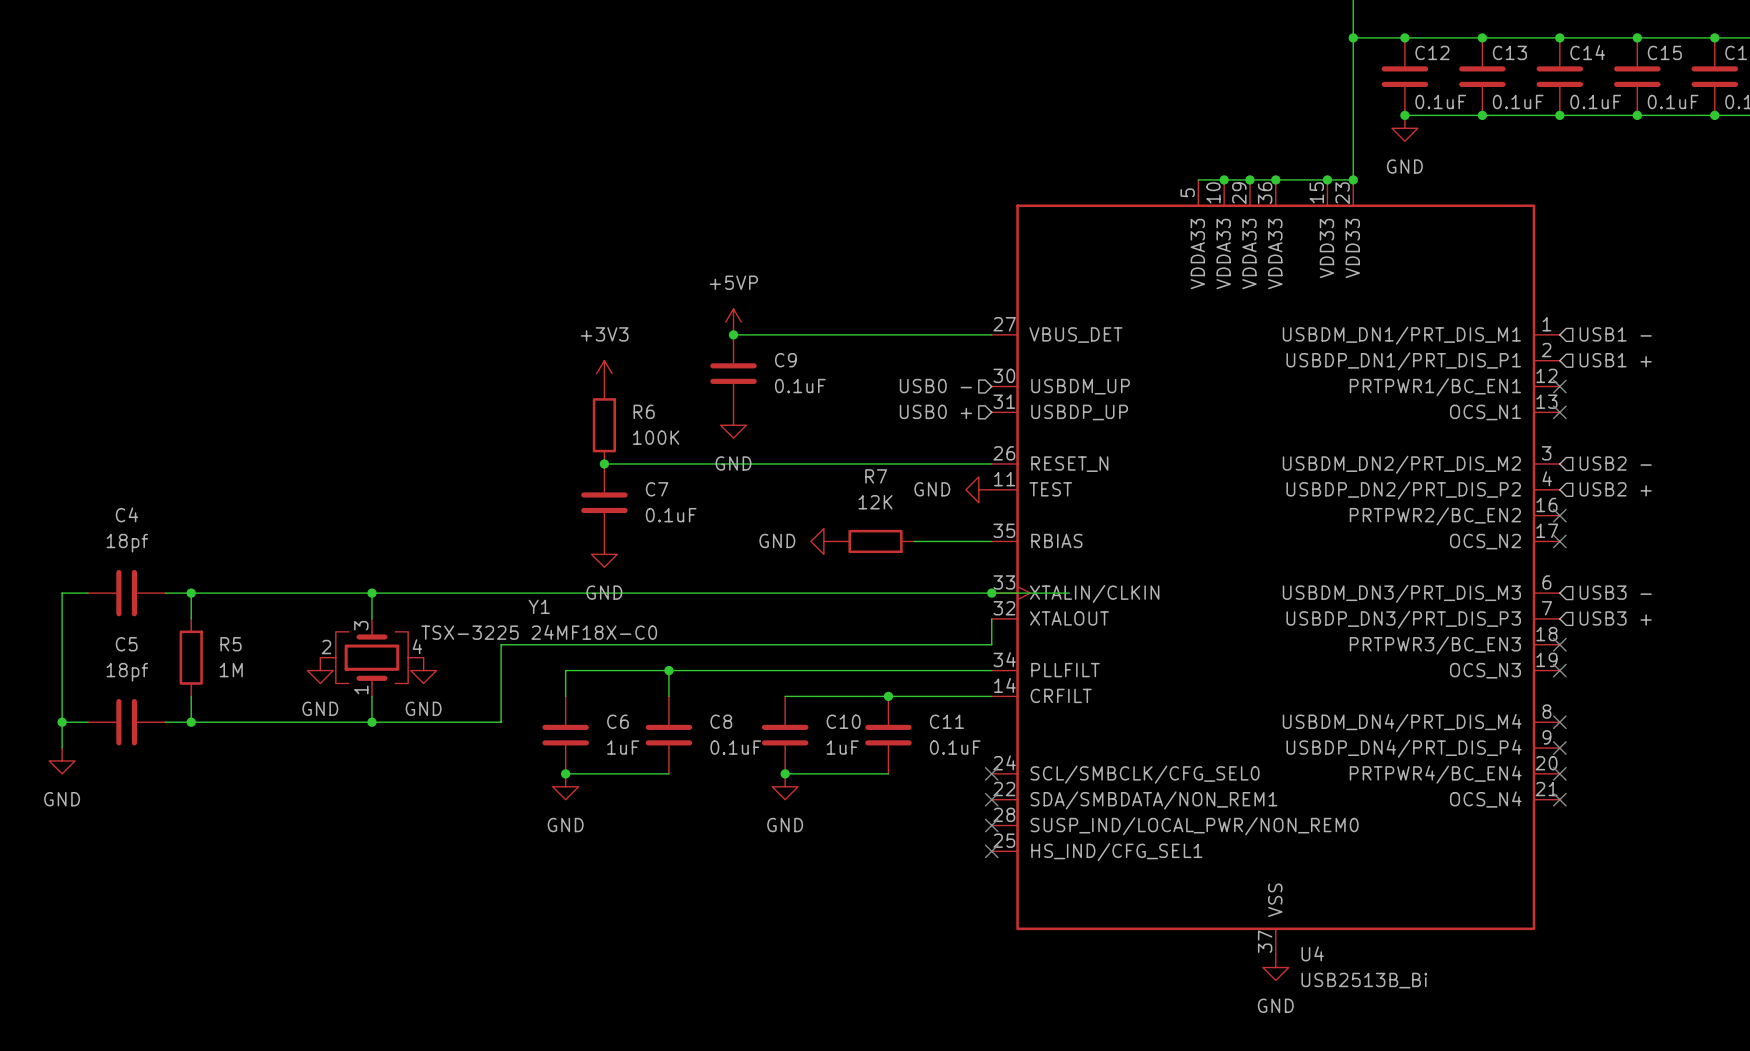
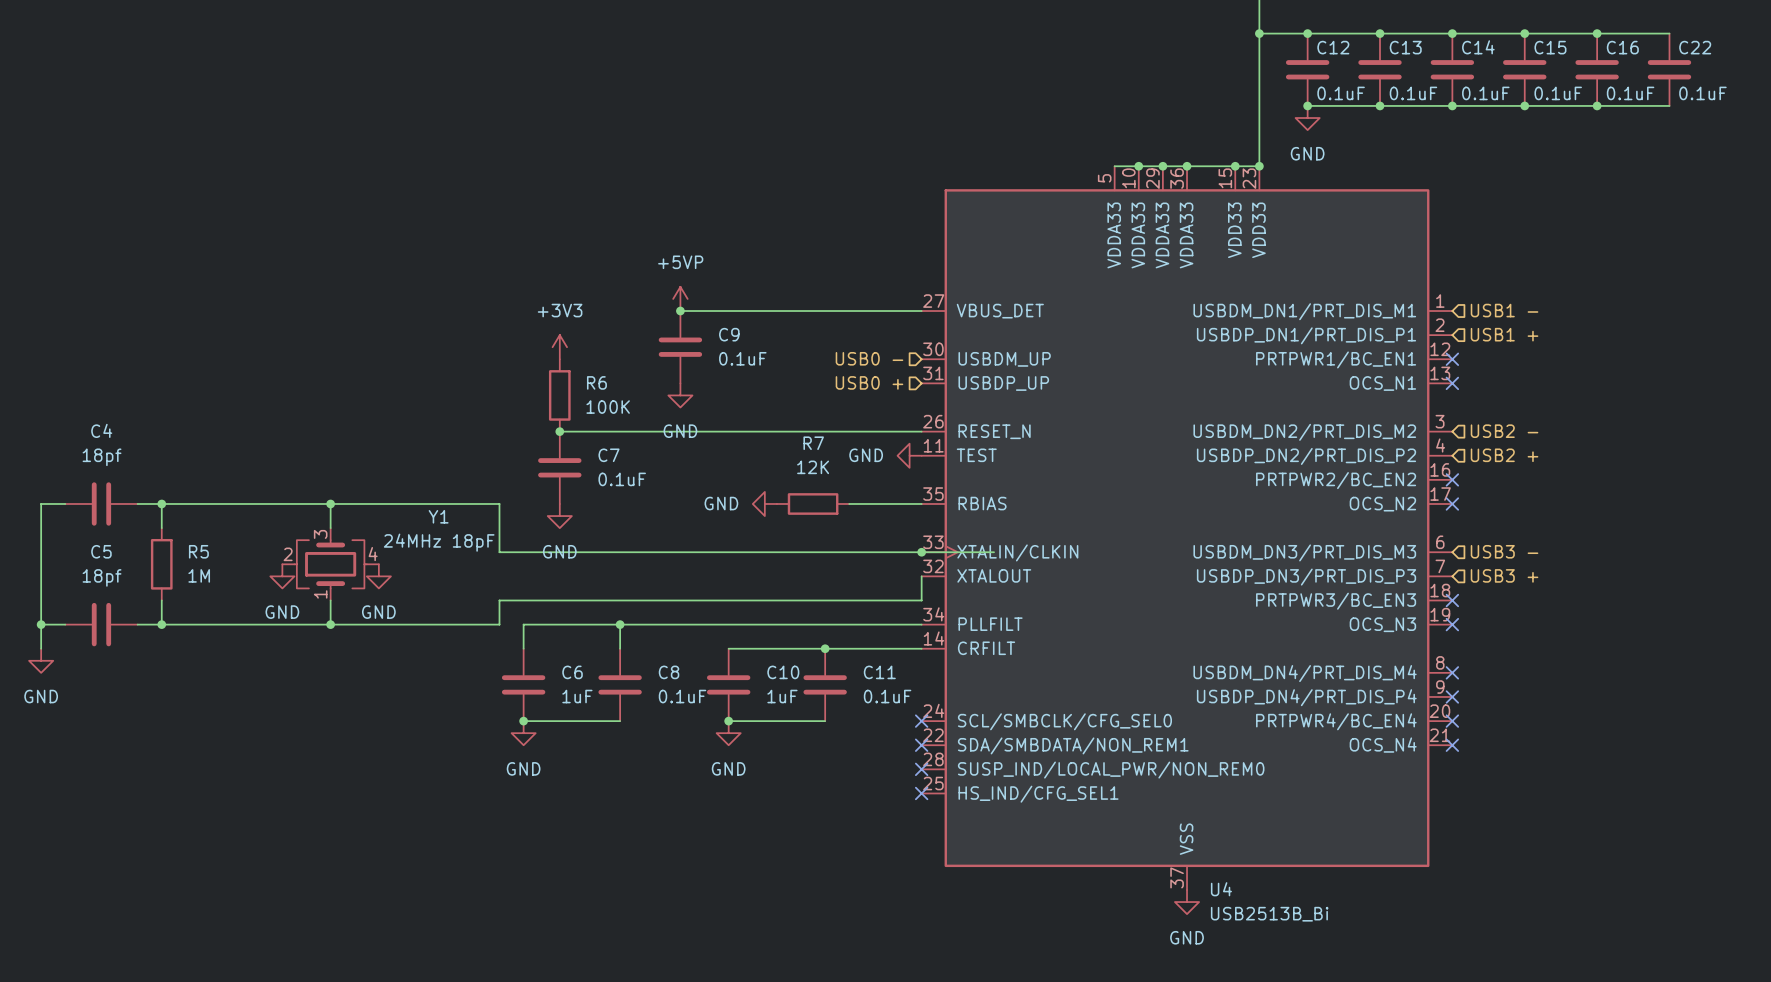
junction: none -> (161, 503)
junction: none -> (330, 503)
wire: (87, 593) (62, 593) (62, 748) -> (65, 503) (41, 503) (41, 648)
C4 position: (126, 593) -> (101, 503)
wire: (165, 593) (539, 593) -> (137, 503) (499, 503) (499, 552)
wire: (191, 593) (191, 618) -> (161, 503) (161, 528)
junction: (191, 593) -> none
wire: (371, 593) (371, 618) -> (330, 503) (330, 528)
junction: (371, 593) -> none
Y1 name position: Y1 (539, 606) -> Y1 (438, 516)
power symbol: none -> GND (282, 576)
power symbol: none -> GND (378, 576)
Y1 value: TSX-3225 24MF18X-C0 (539, 632) -> 24MHz 18pF (439, 542)
wire: (539, 644) (501, 644) (501, 722) (165, 722) -> (499, 600) (499, 624) (137, 624)
R5 position: (191, 657) -> (161, 564)
Y1 position: (371, 657) -> (330, 564)
junction: none -> (161, 624)
power symbol: GND (320, 670) -> none
junction: none -> (330, 624)
power symbol: GND (423, 670) -> none
wire: (191, 696) (191, 722) -> (161, 600) (161, 624)
wire: (371, 696) (371, 722) -> (330, 600) (330, 624)
wire: (62, 722) (87, 722) -> (41, 624) (65, 624)
junction position: (62, 722) -> (41, 624)
C5 position: (126, 722) -> (101, 624)
junction: (191, 722) -> none
junction: (371, 722) -> none
power symbol position: GND (62, 760) -> GND (41, 660)

